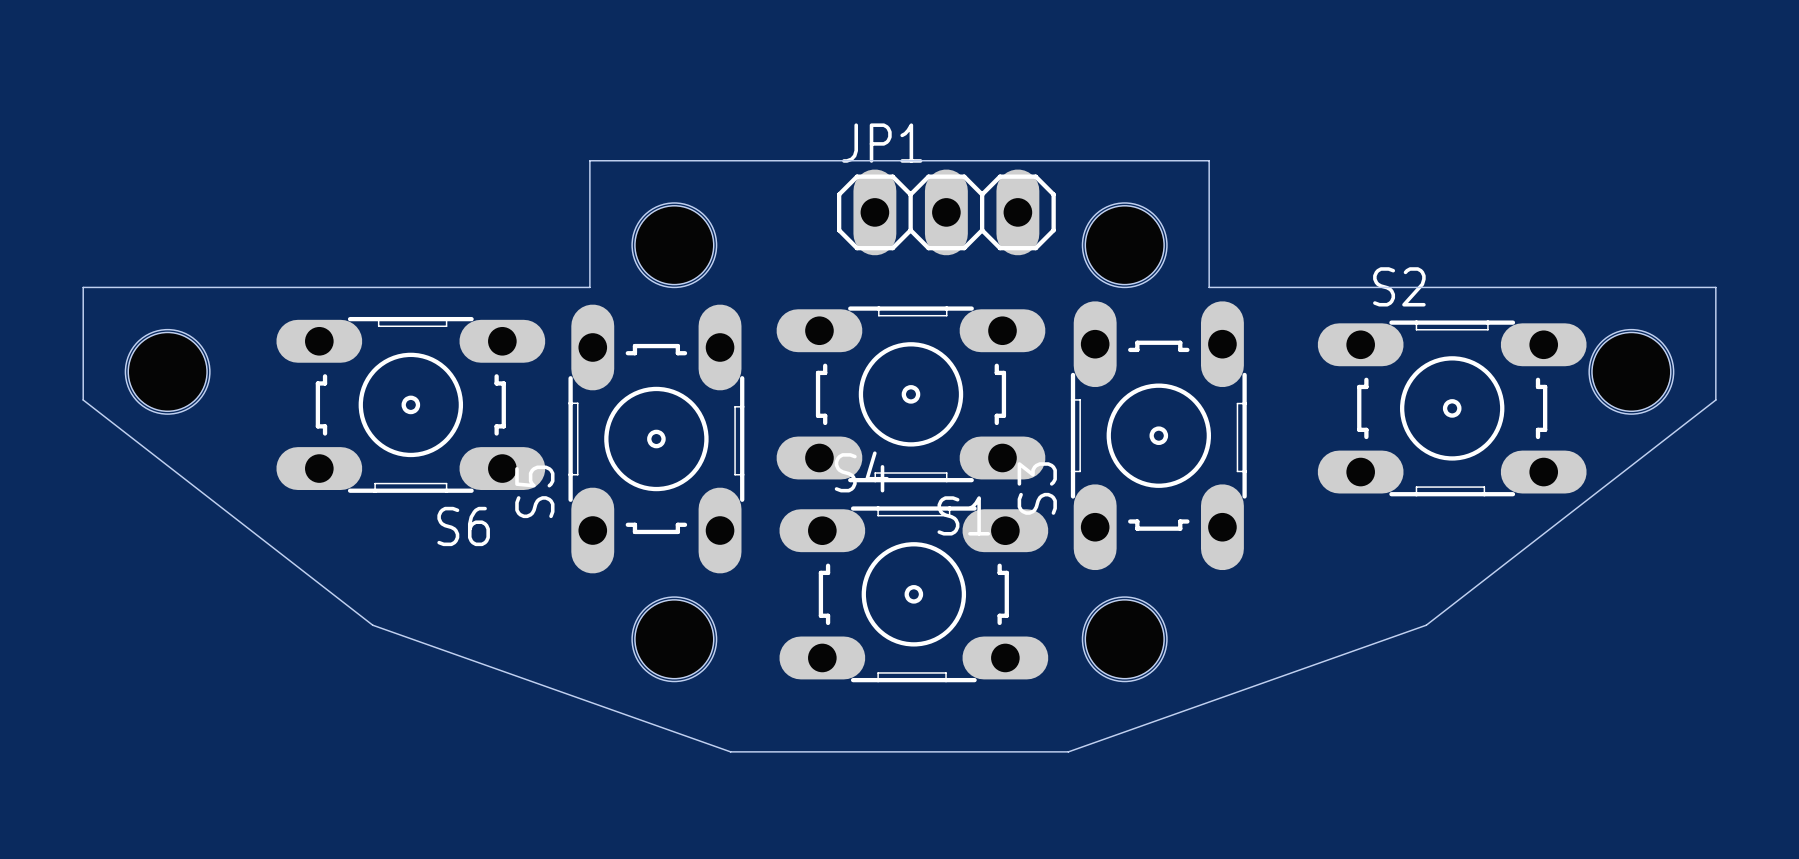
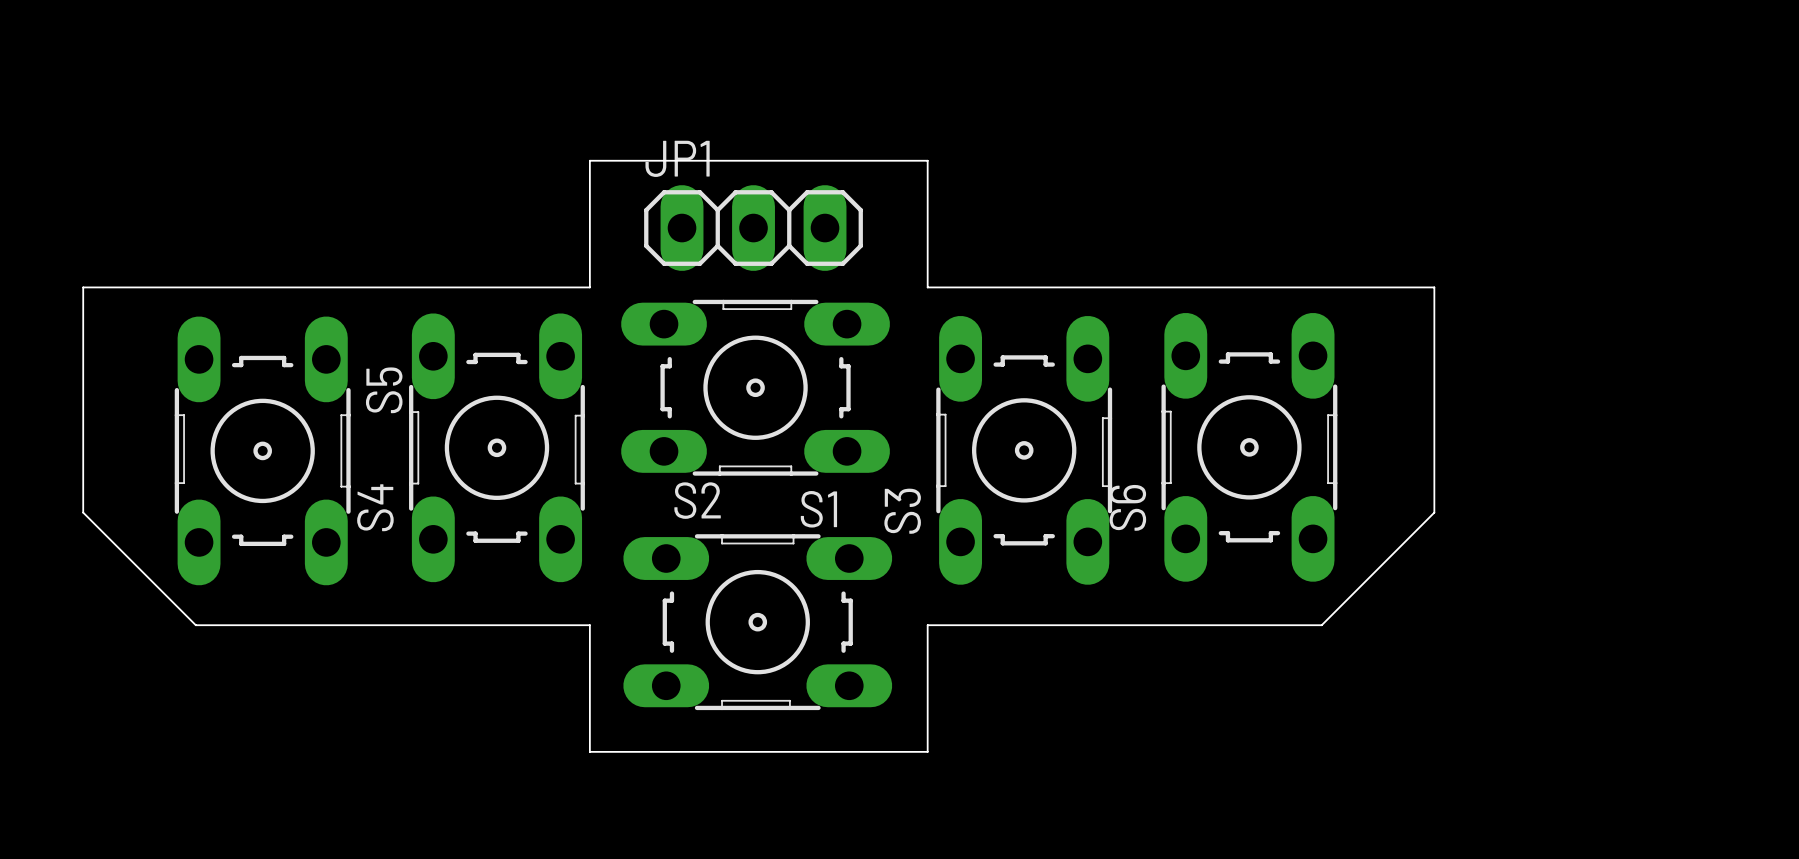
board edge: (927, 160) (1209, 160) (1209, 287) -> (927, 160) (927, 287) (1209, 287)
round board edge: [632, 202, 717, 288] -> none
round board edge: [1082, 202, 1167, 288] -> none
JP1 position: (946, 212) -> (753, 228)
hole: (674, 245) -> none
hole: (1124, 245) -> none
board edge: (1434, 287) (1715, 287) (1715, 400) (1426, 625) (1068, 751) (927, 751) -> (1434, 287) (1434, 512) (1321, 625) (927, 625) (927, 751)
round board edge: [125, 329, 210, 415] -> none
round board edge: [1589, 329, 1674, 415] -> none
hole: (167, 371) -> none
hole: (1631, 371) -> none
S1 position: (910, 394) -> (755, 387)
board edge: (83, 400) (372, 625) (730, 751) -> (83, 400) (83, 512) (195, 625) (589, 625) (589, 751) (730, 751)
S6 rotation: 0° (410, 404) -> 90° clockwise (1249, 447)
S6 position: (410, 404) -> (1249, 447)
S2 position: (1452, 408) -> (757, 622)
S3 position: (1158, 435) -> (1024, 450)
S5 rotation: 0° (656, 439) -> 180° (262, 450)
S5 position: (656, 439) -> (262, 450)
S4 rotation: 0° (913, 594) -> 90° counterclockwise (496, 447)
S4 position: (913, 594) -> (496, 447)
round board edge: [632, 597, 717, 682] -> none
round board edge: [1082, 597, 1167, 682] -> none
hole: (674, 639) -> none
hole: (1124, 639) -> none

